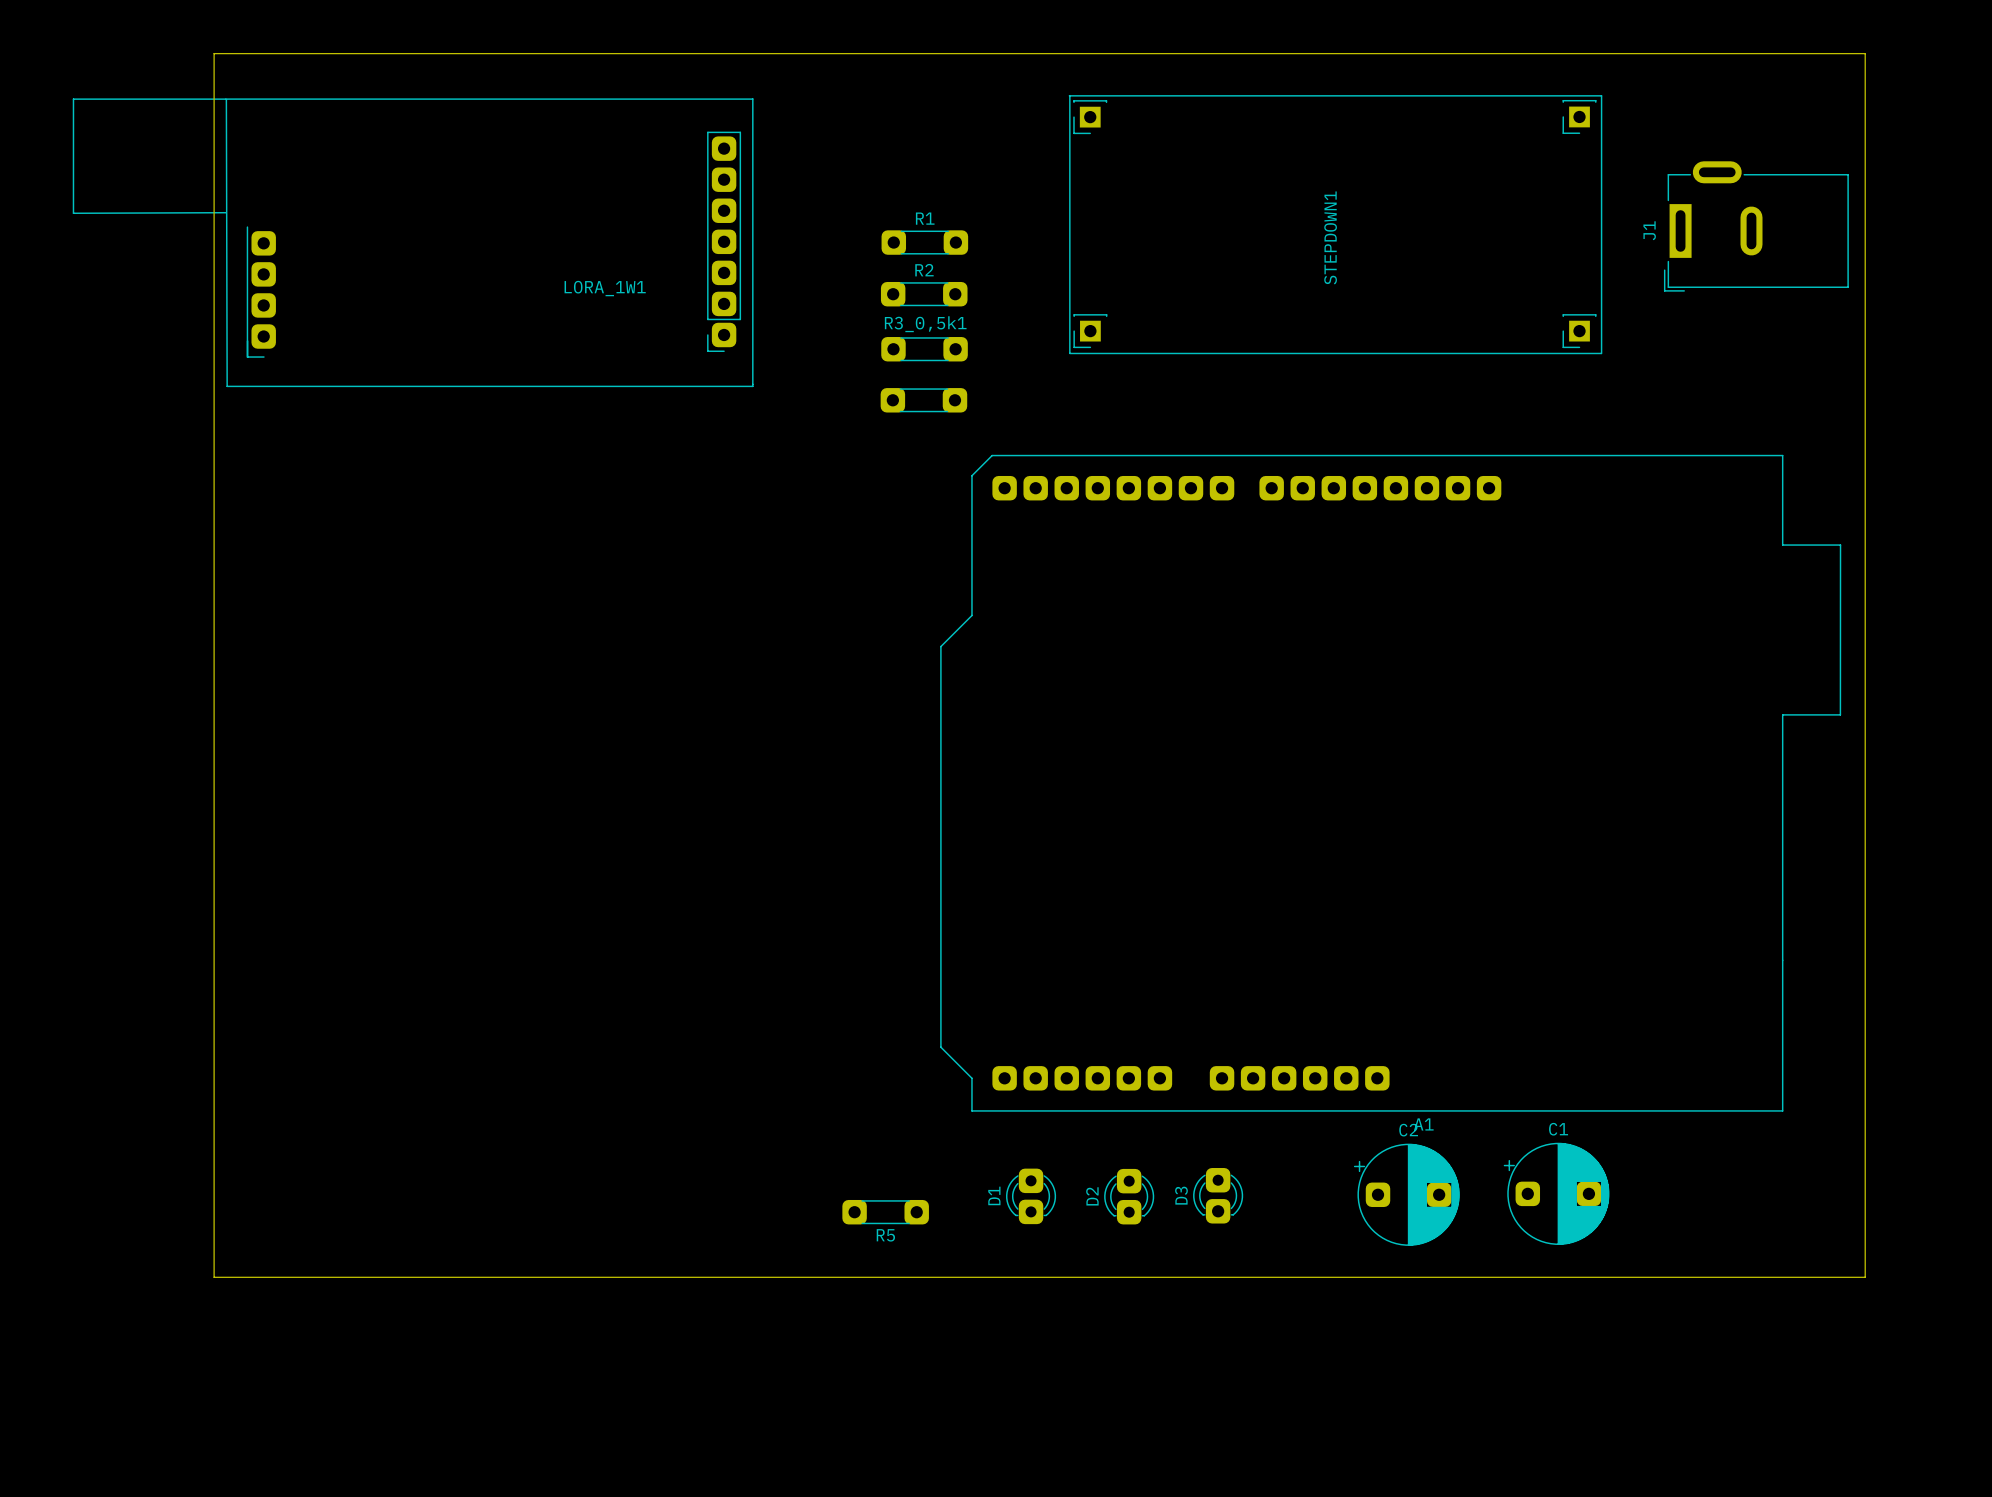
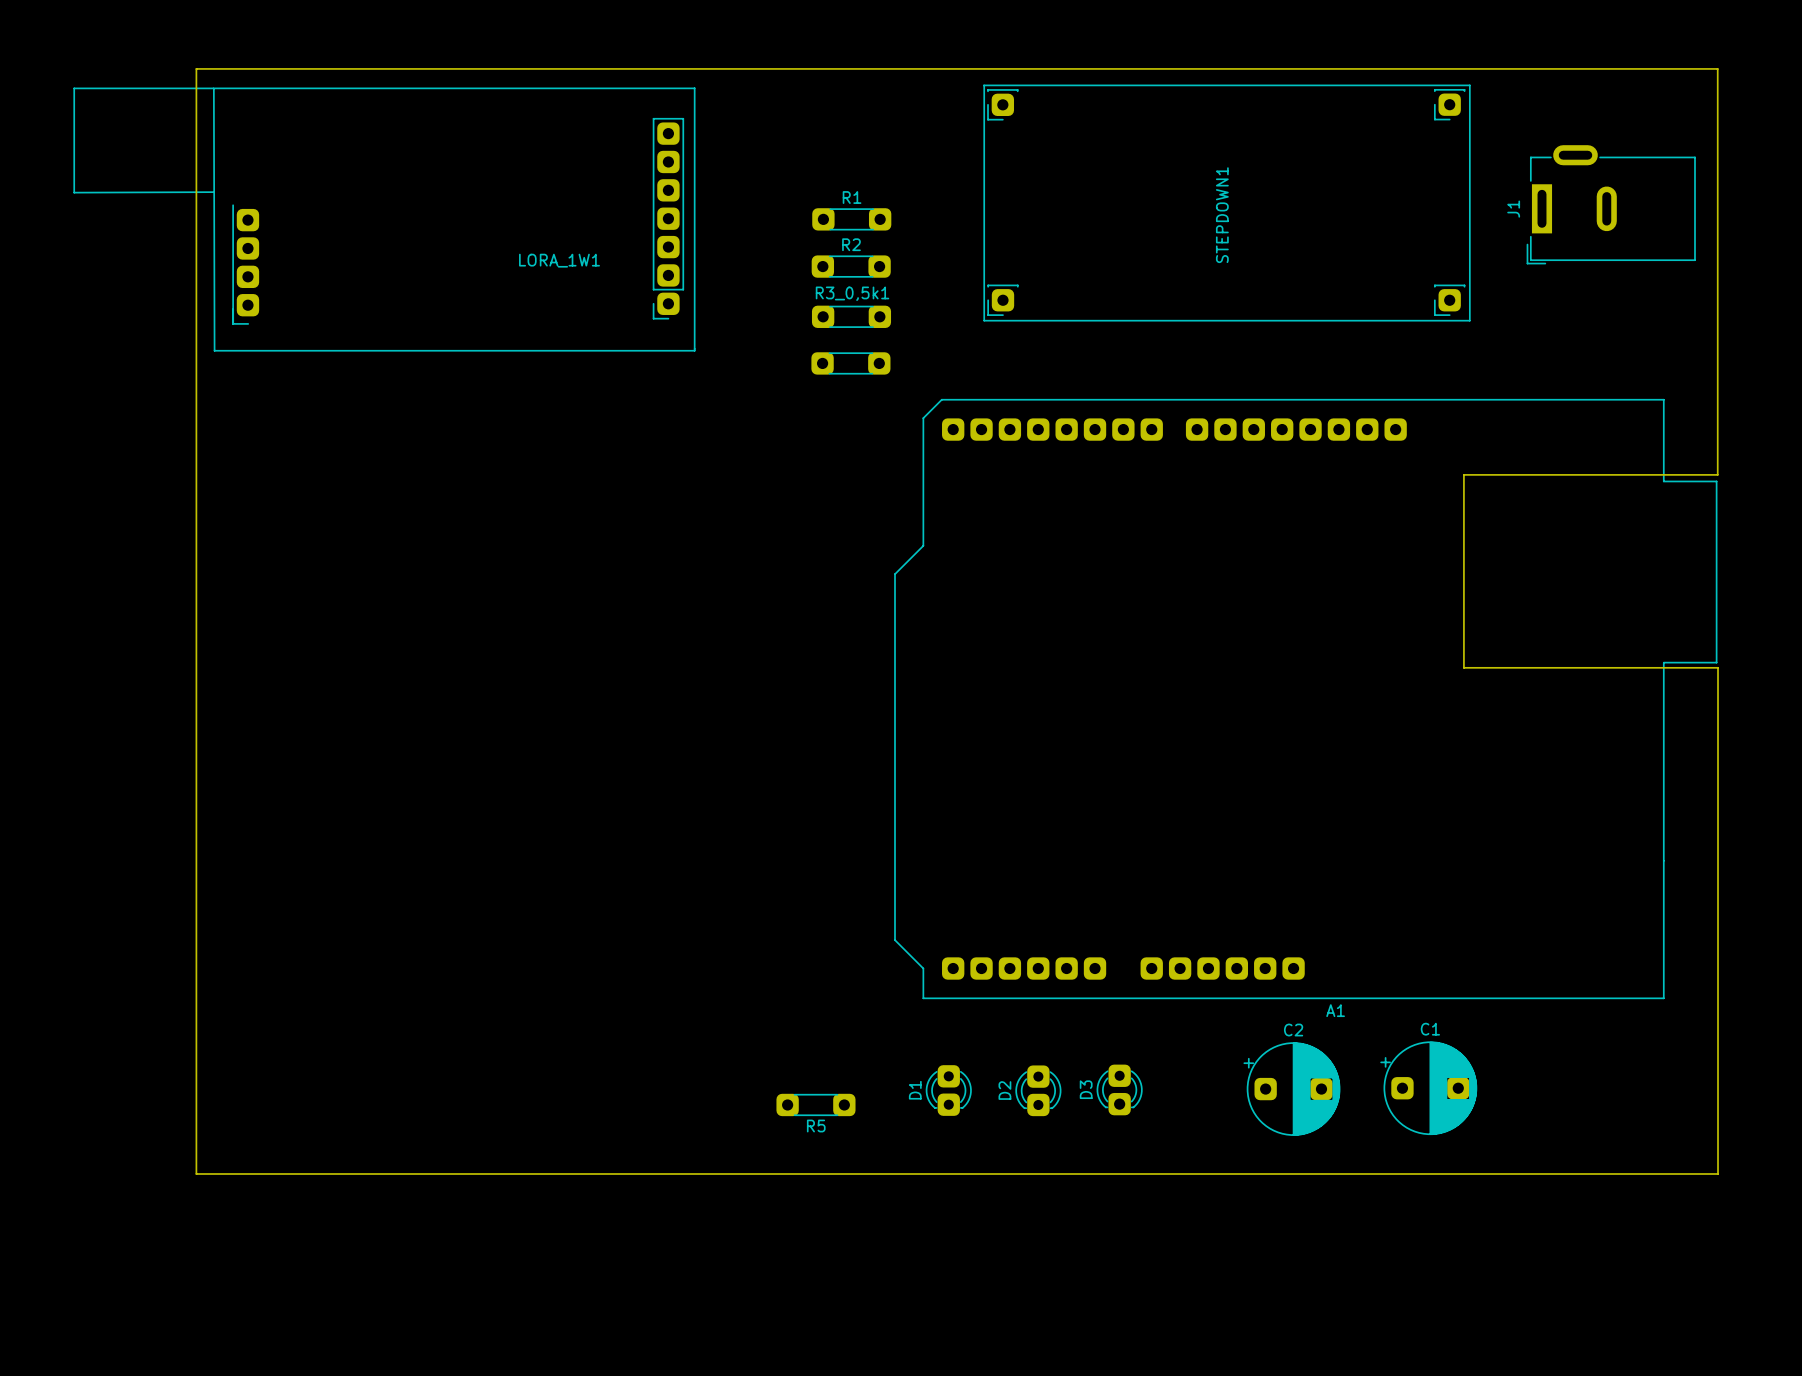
board edge: (214, 53) (1865, 53) (1865, 1277) (214, 1277) (214, 53) -> (196, 68) (196, 1173) (1718, 1173) (1718, 667) (1463, 667) (1463, 474) (1717, 474) (1717, 68) (196, 68)
STEPDOWN1 footprint: [1068, 95, 1603, 355] -> [983, 84, 1471, 322]
A1 footprint: [940, 454, 1842, 1112] -> [894, 399, 1718, 1000]

